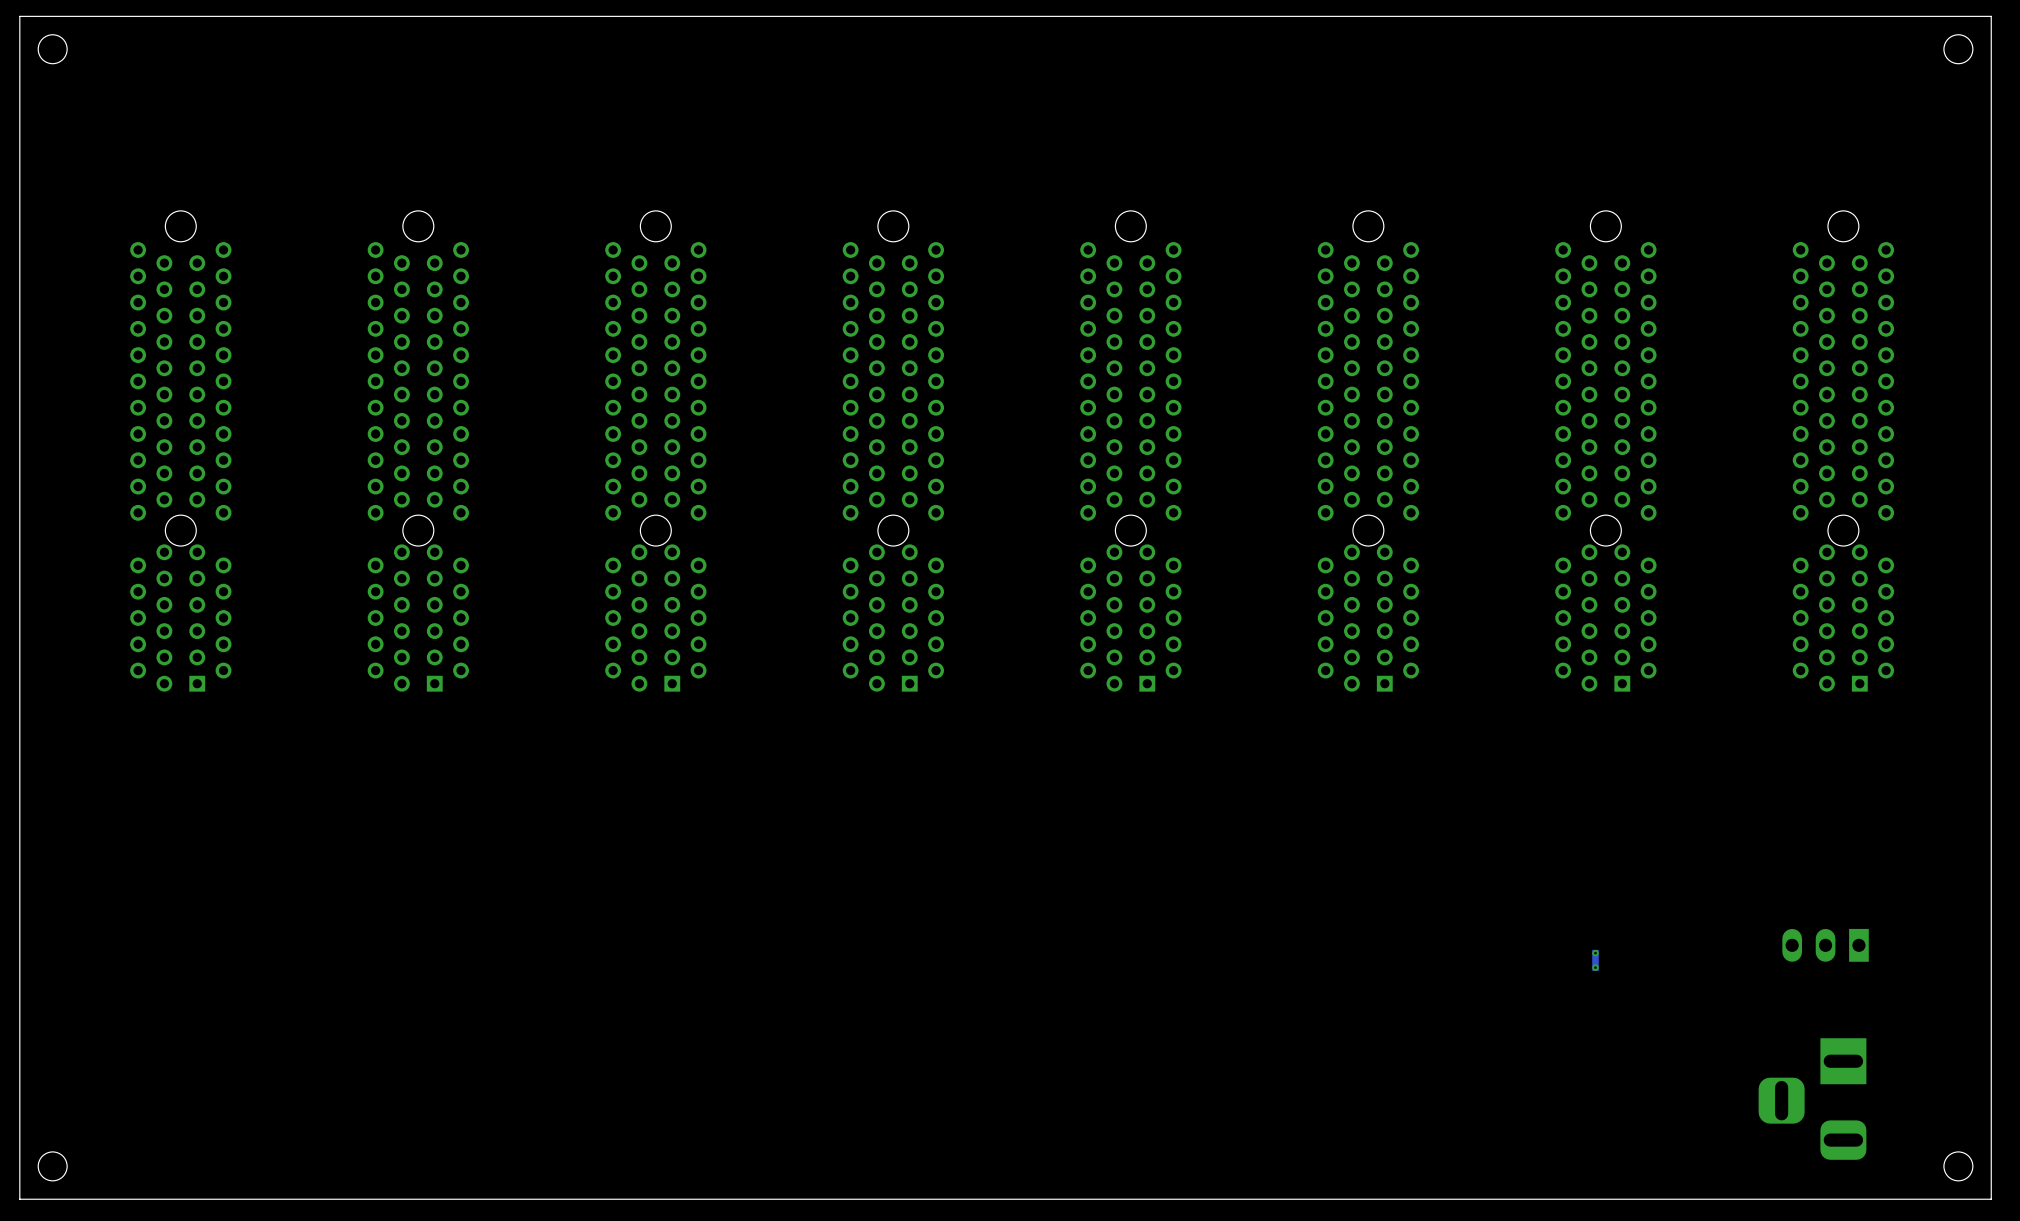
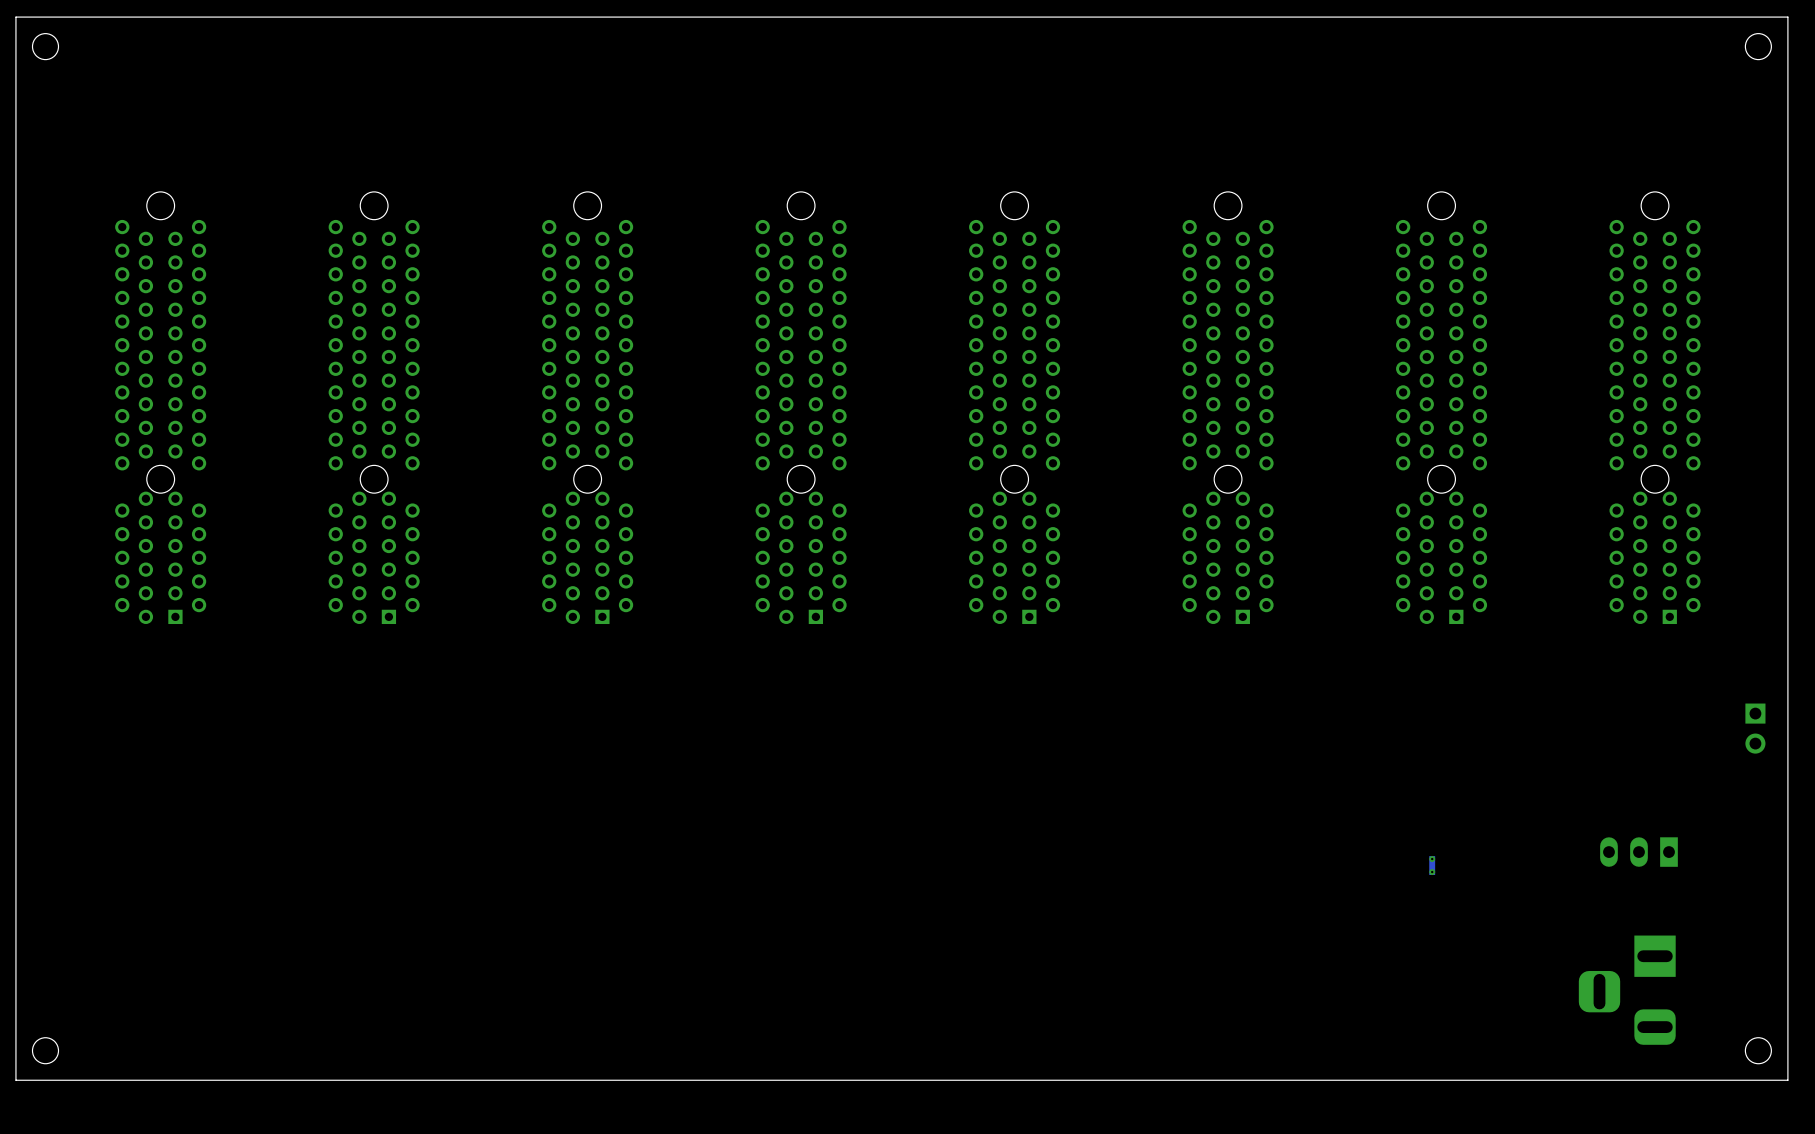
part: none -> (1755, 728)

